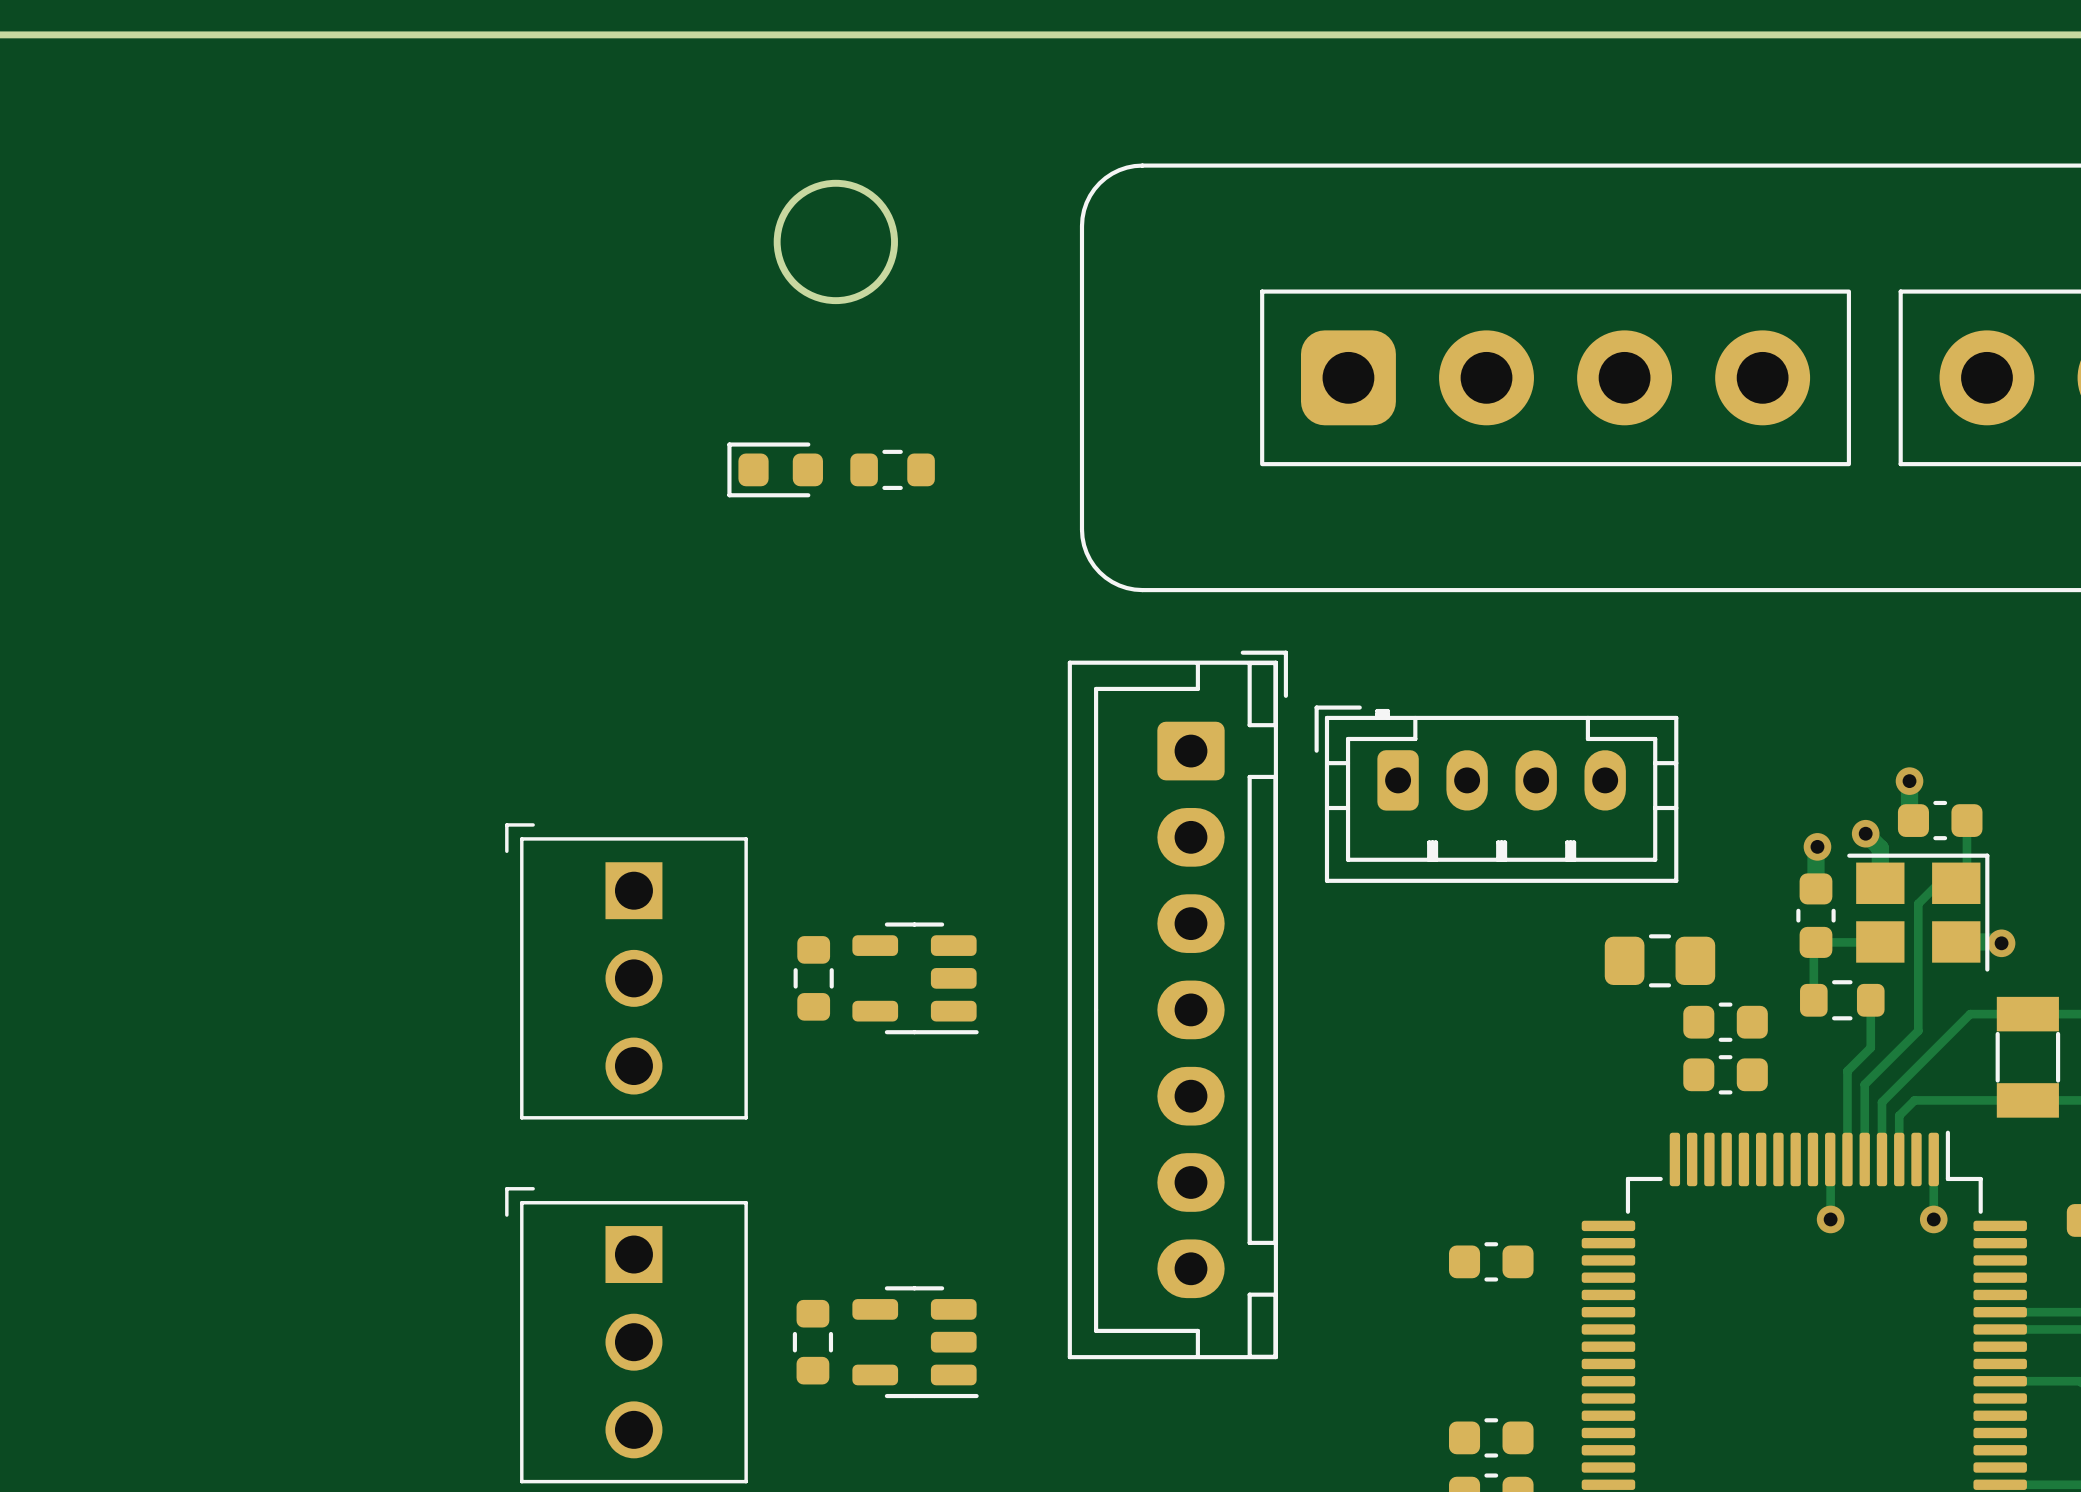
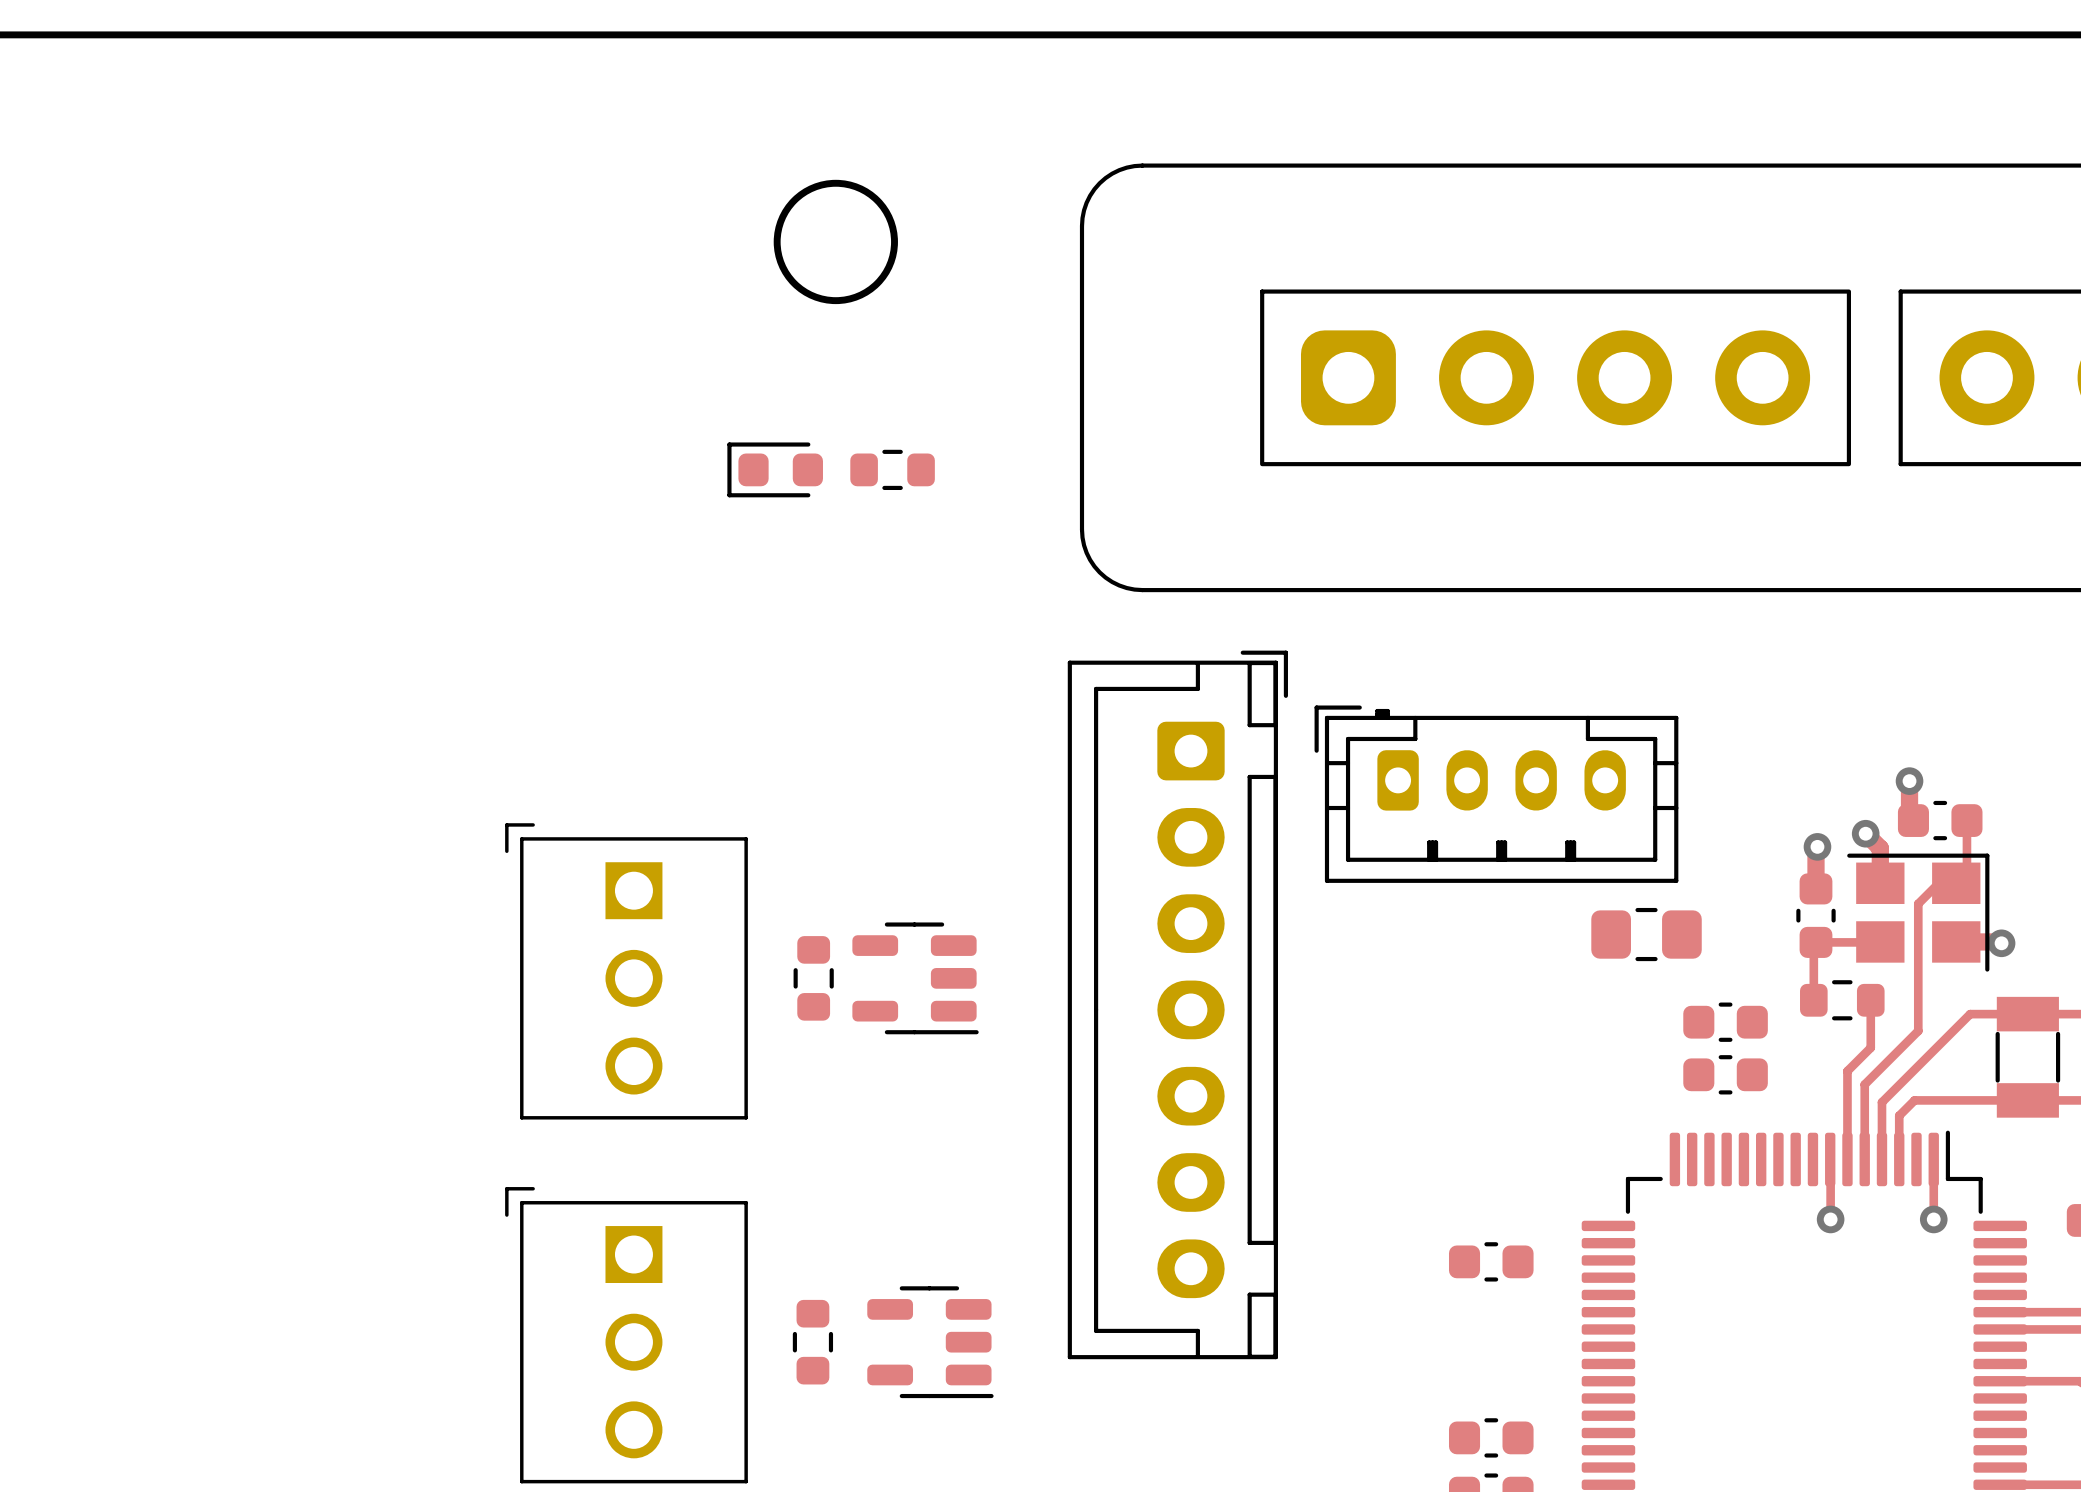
part position: (1659, 960) -> (1646, 934)
part position: (915, 1342) -> (930, 1342)

